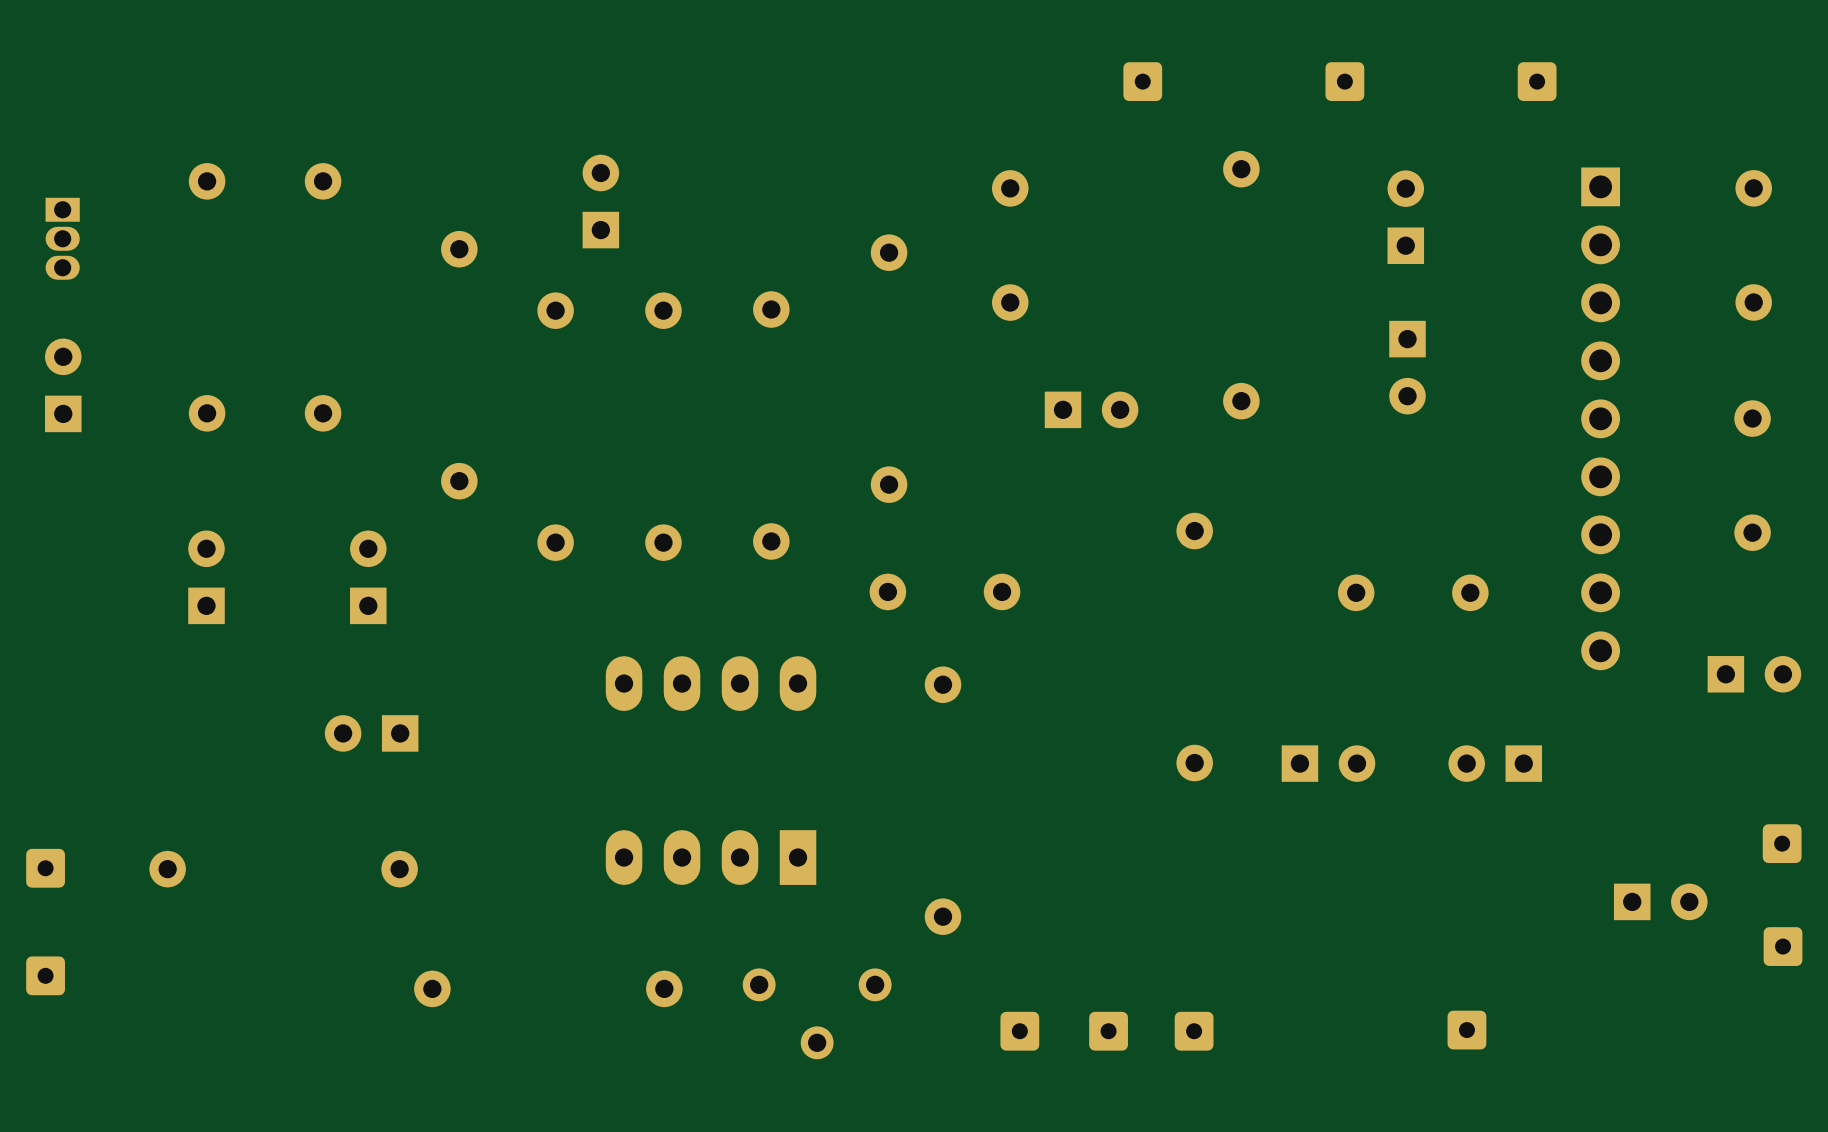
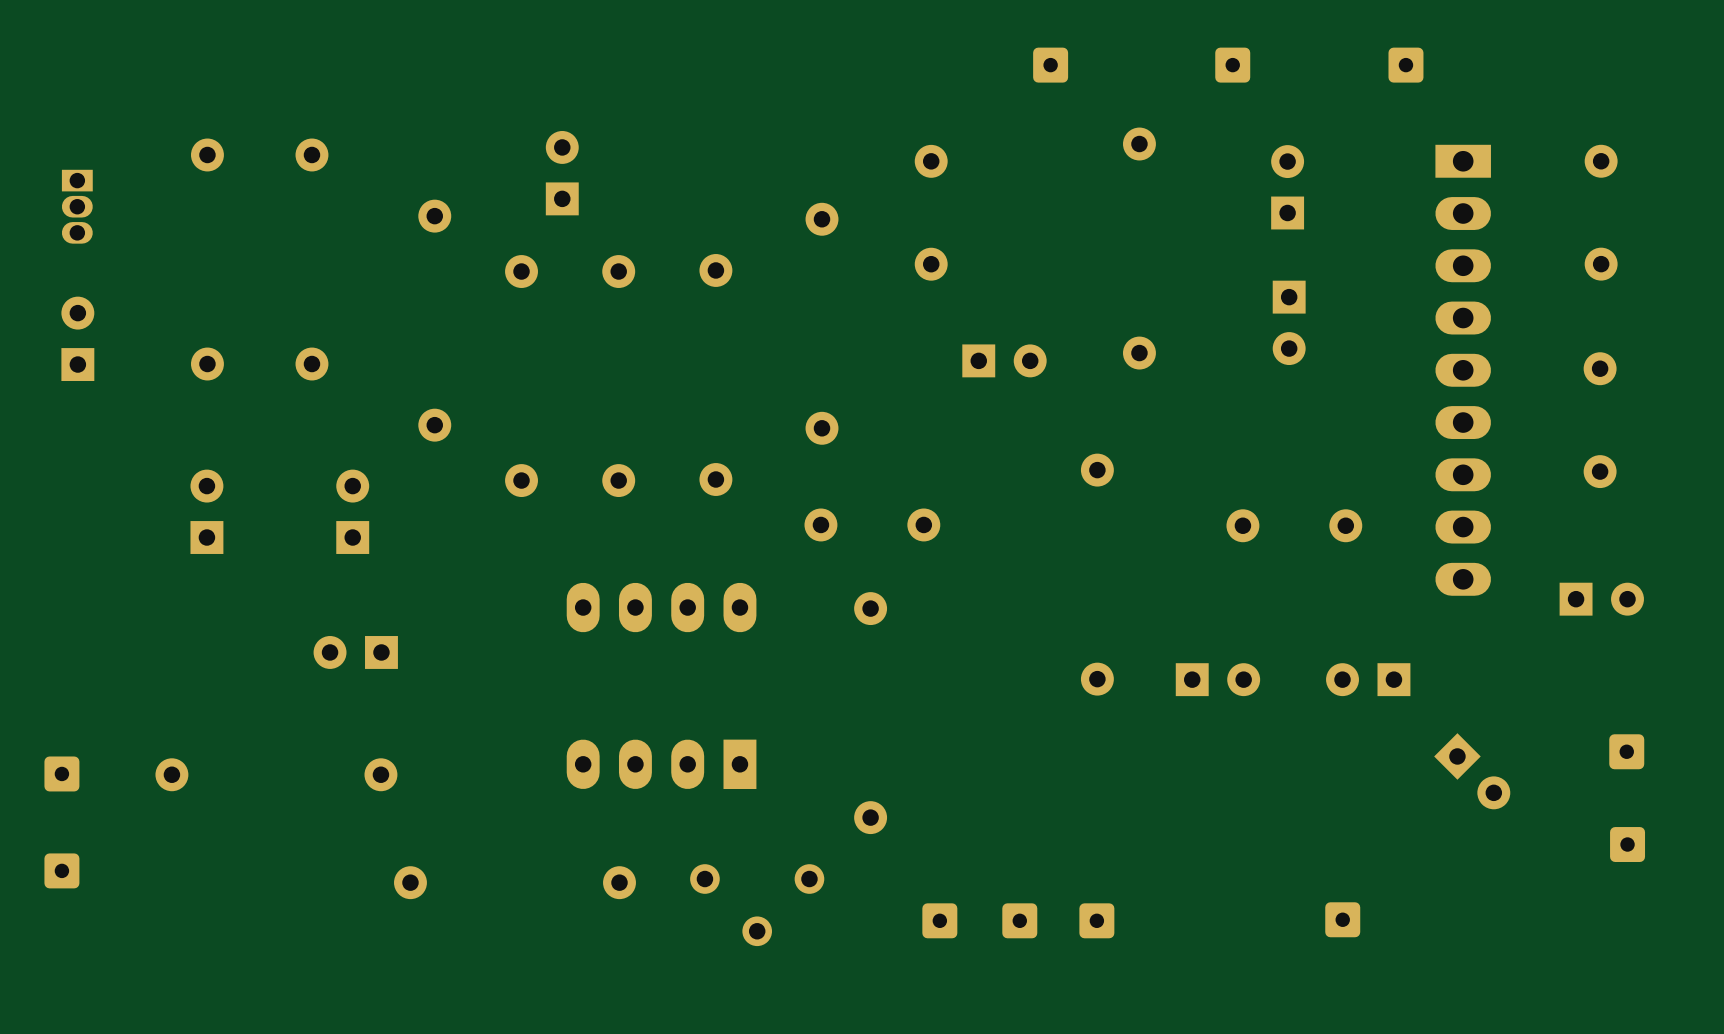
part footprint: [1581, 167, 1621, 671] -> [1435, 144, 1491, 596]
part: none -> (1472, 771)
part: (1660, 901) -> none

